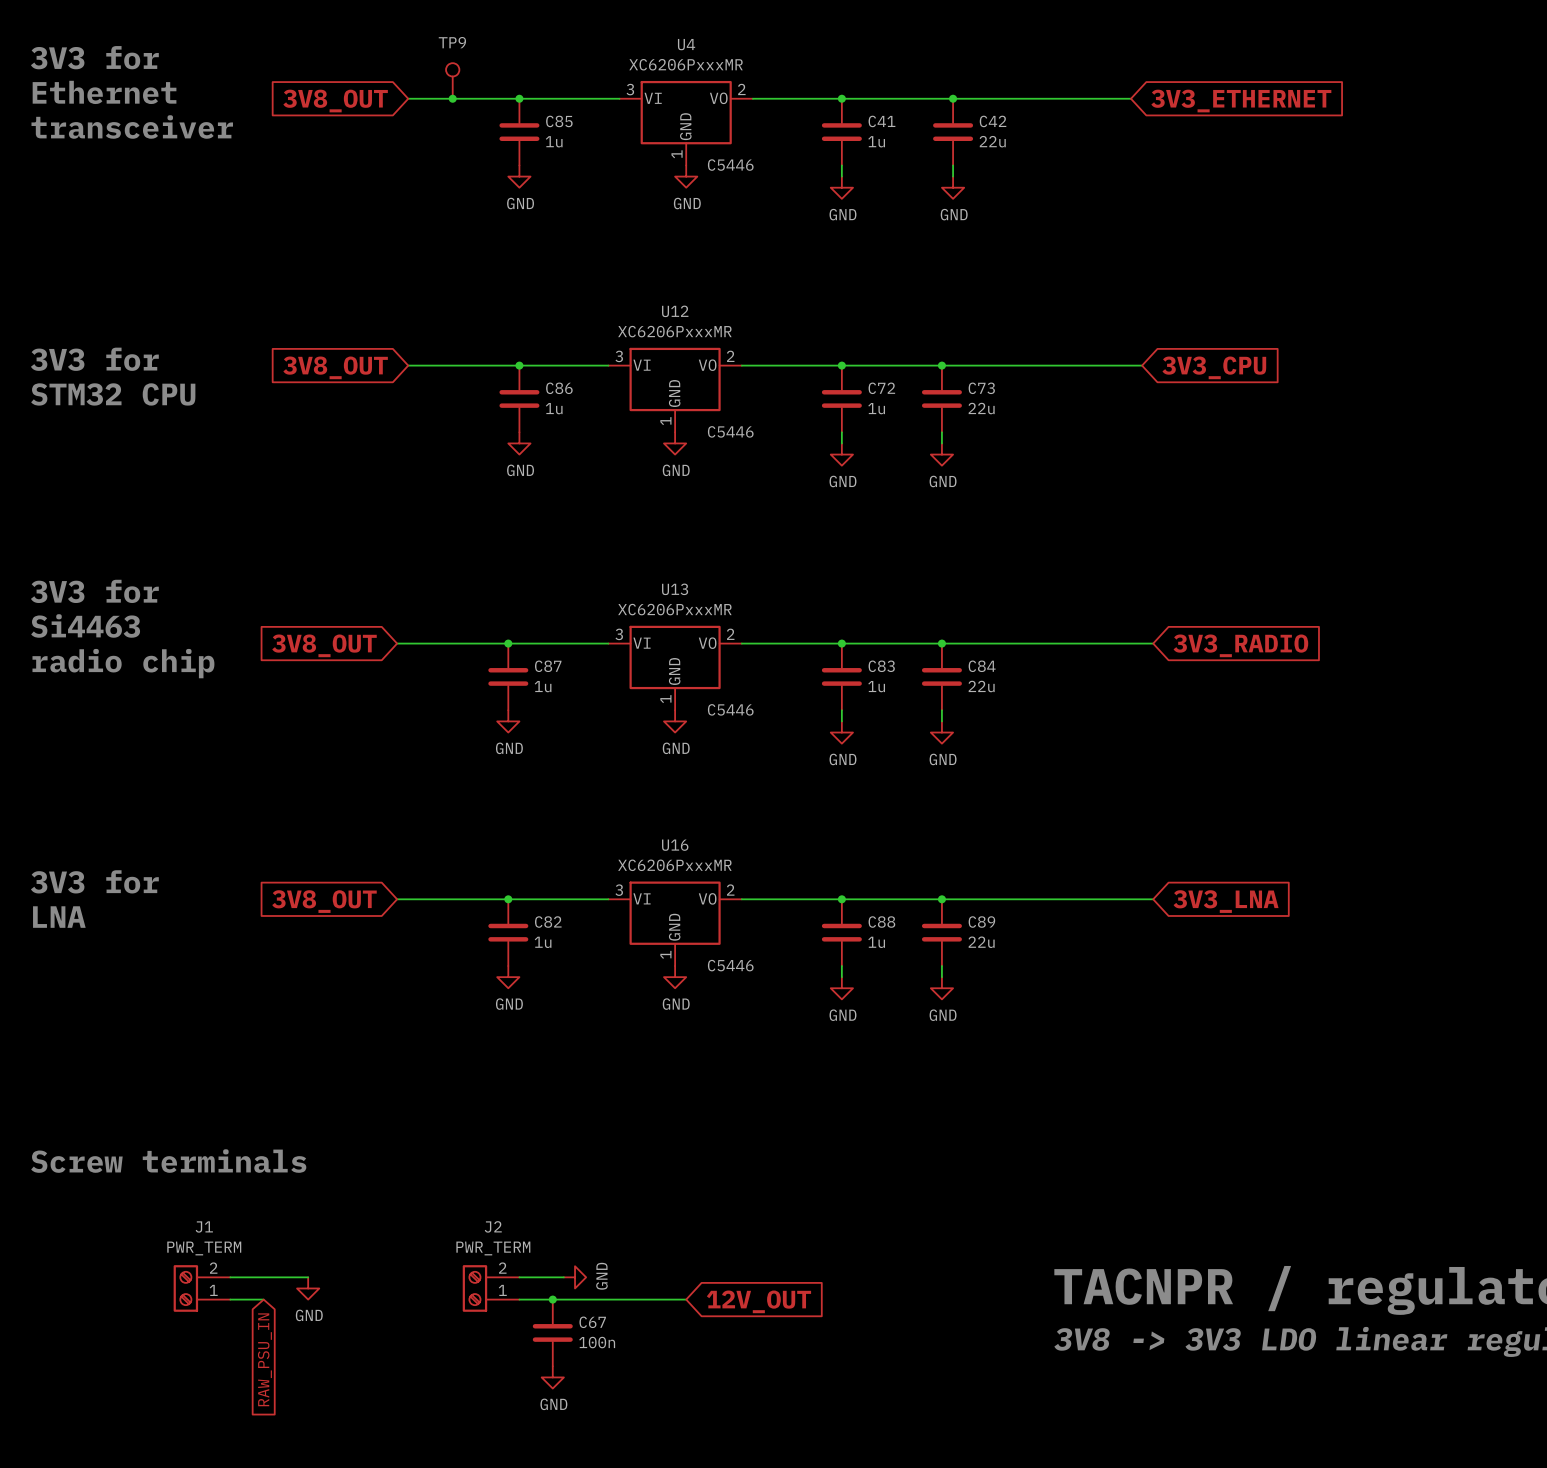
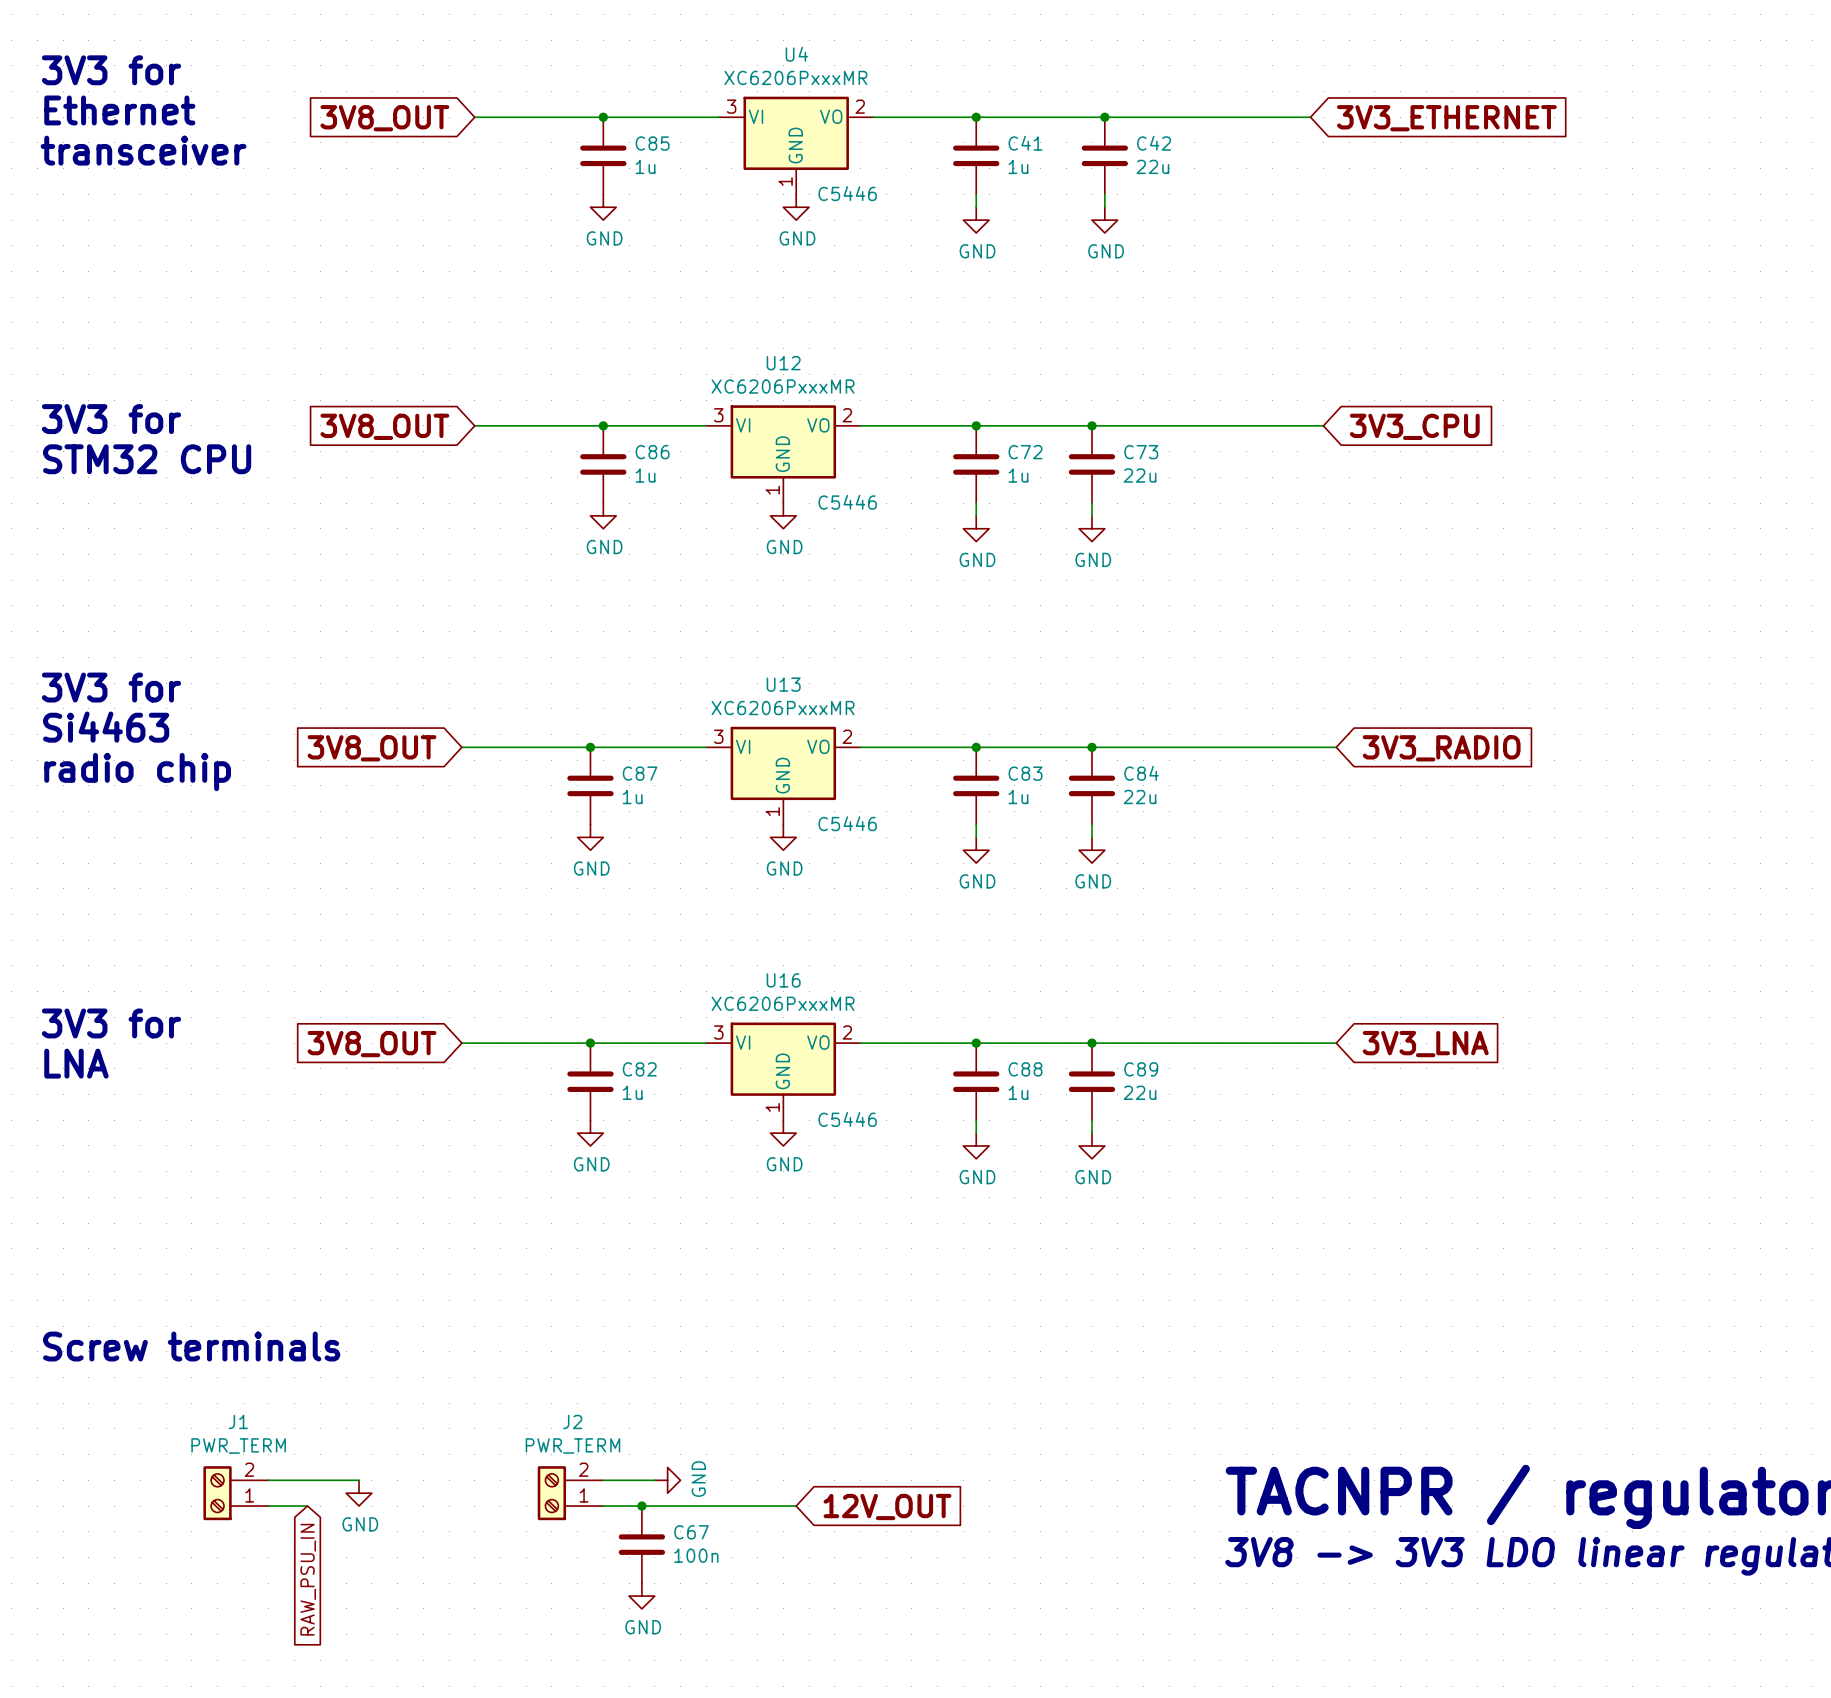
TP9: (452, 80) -> none
junction: (452, 98) -> none

